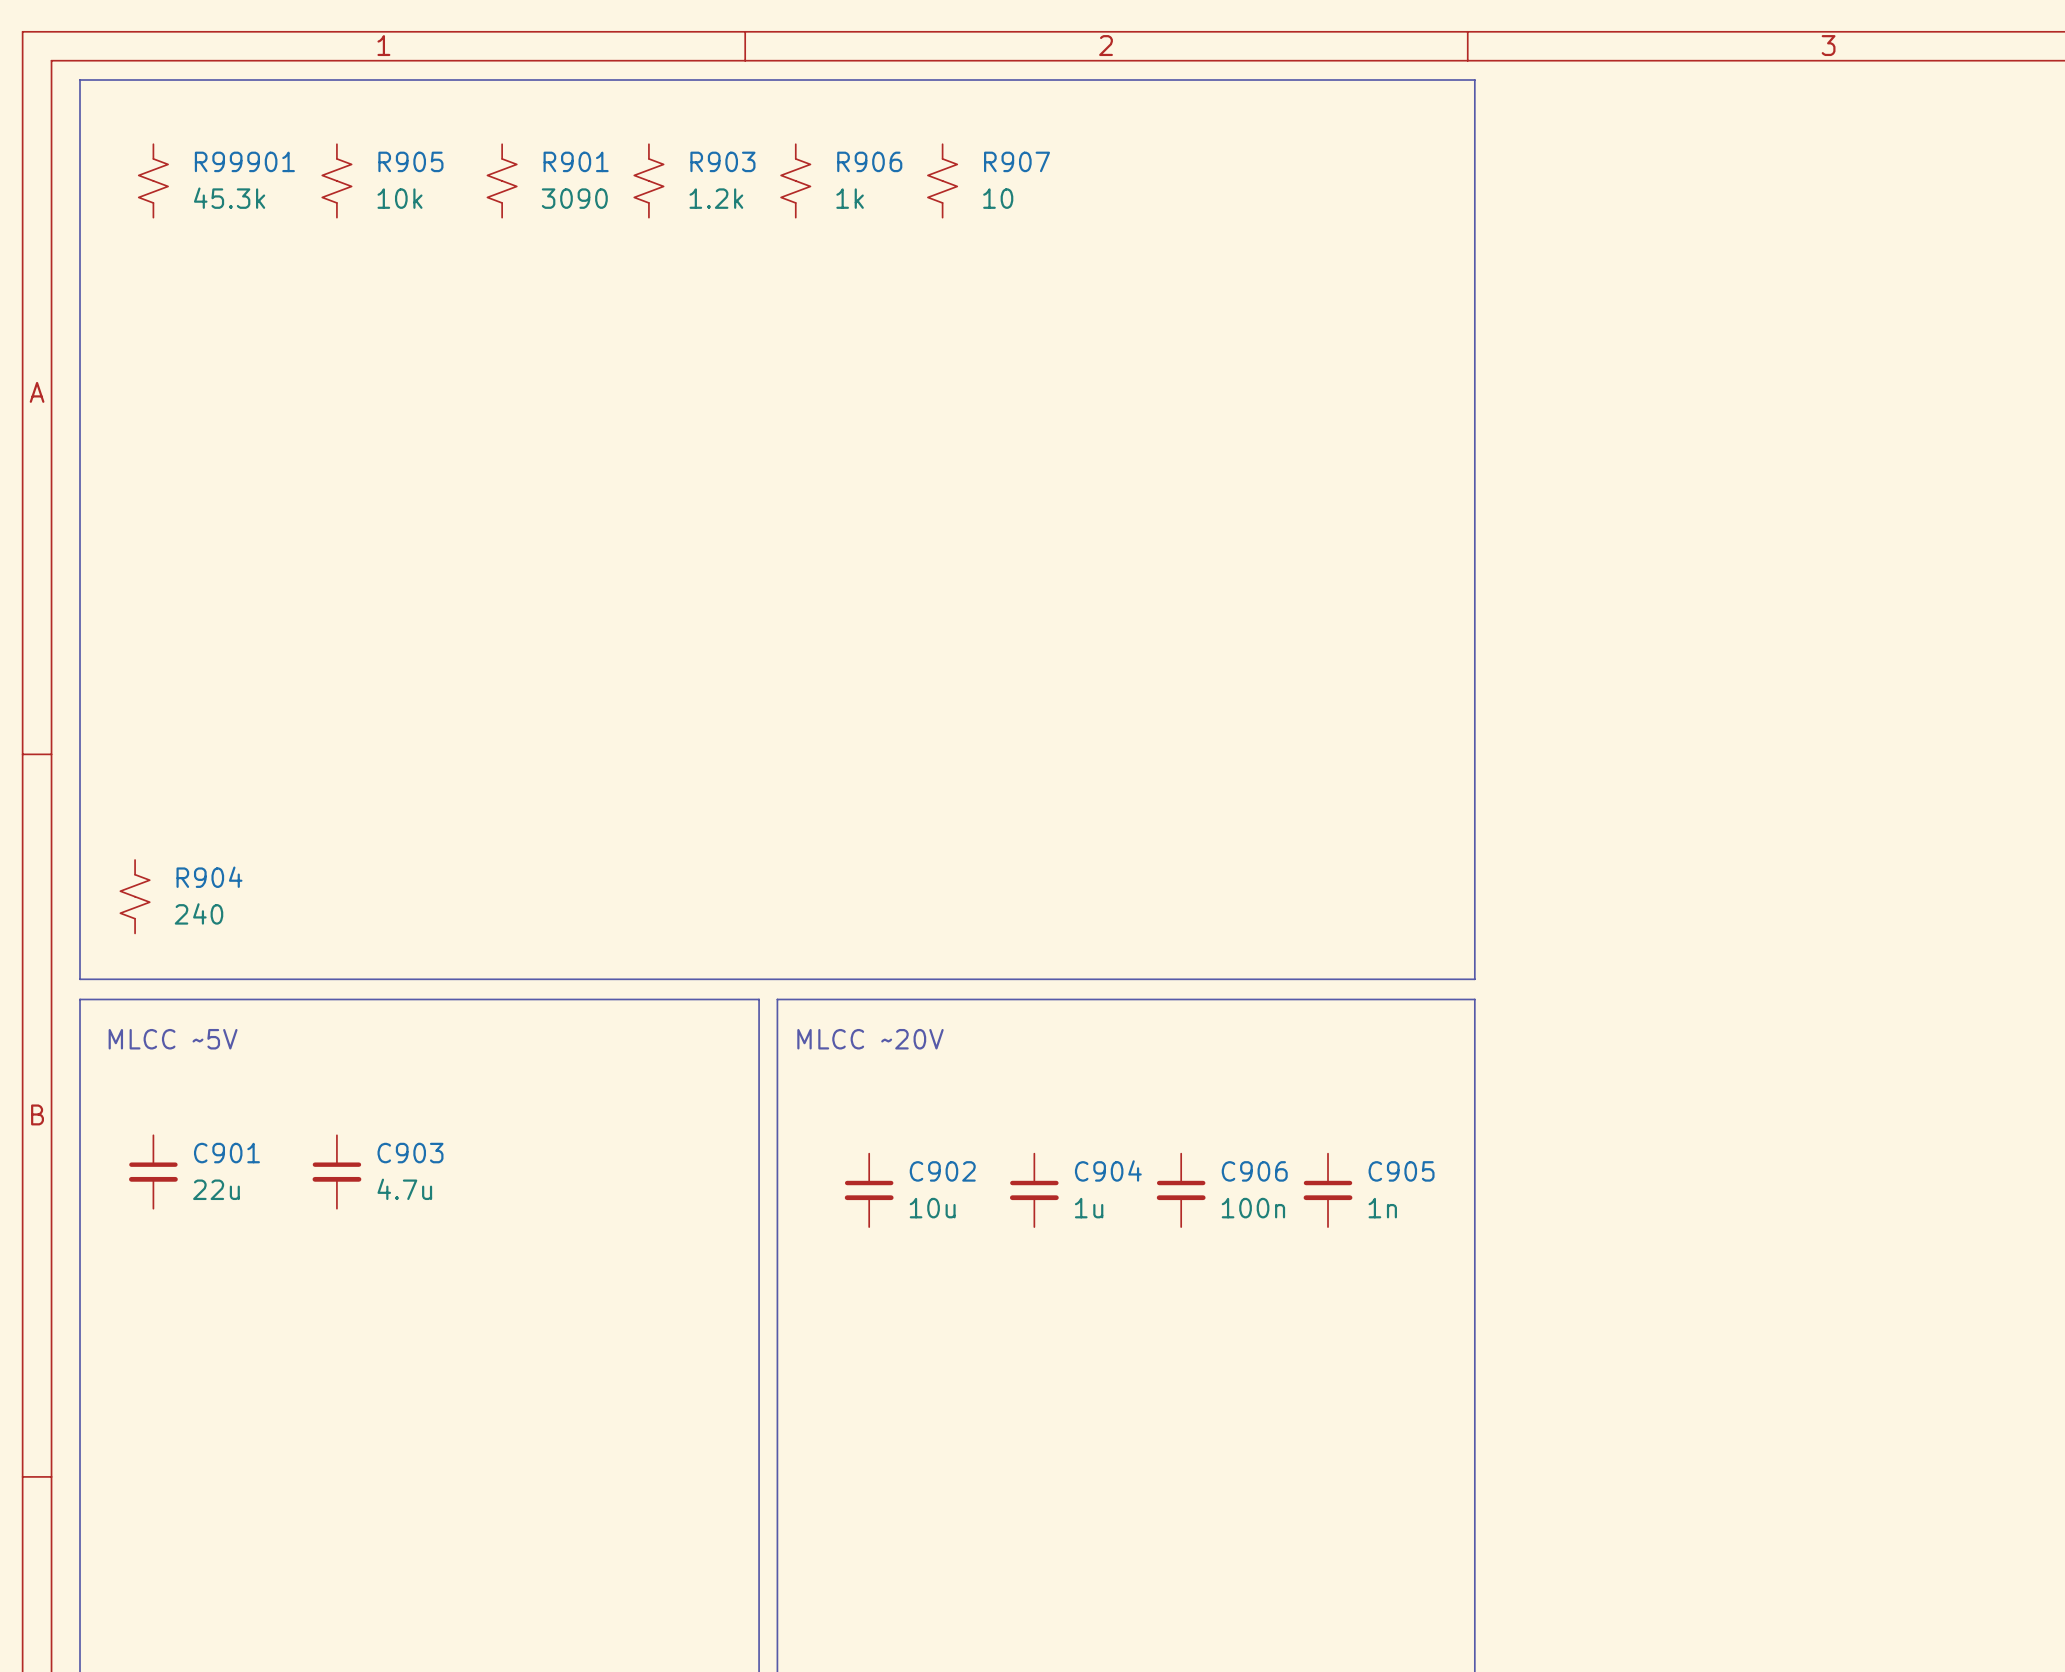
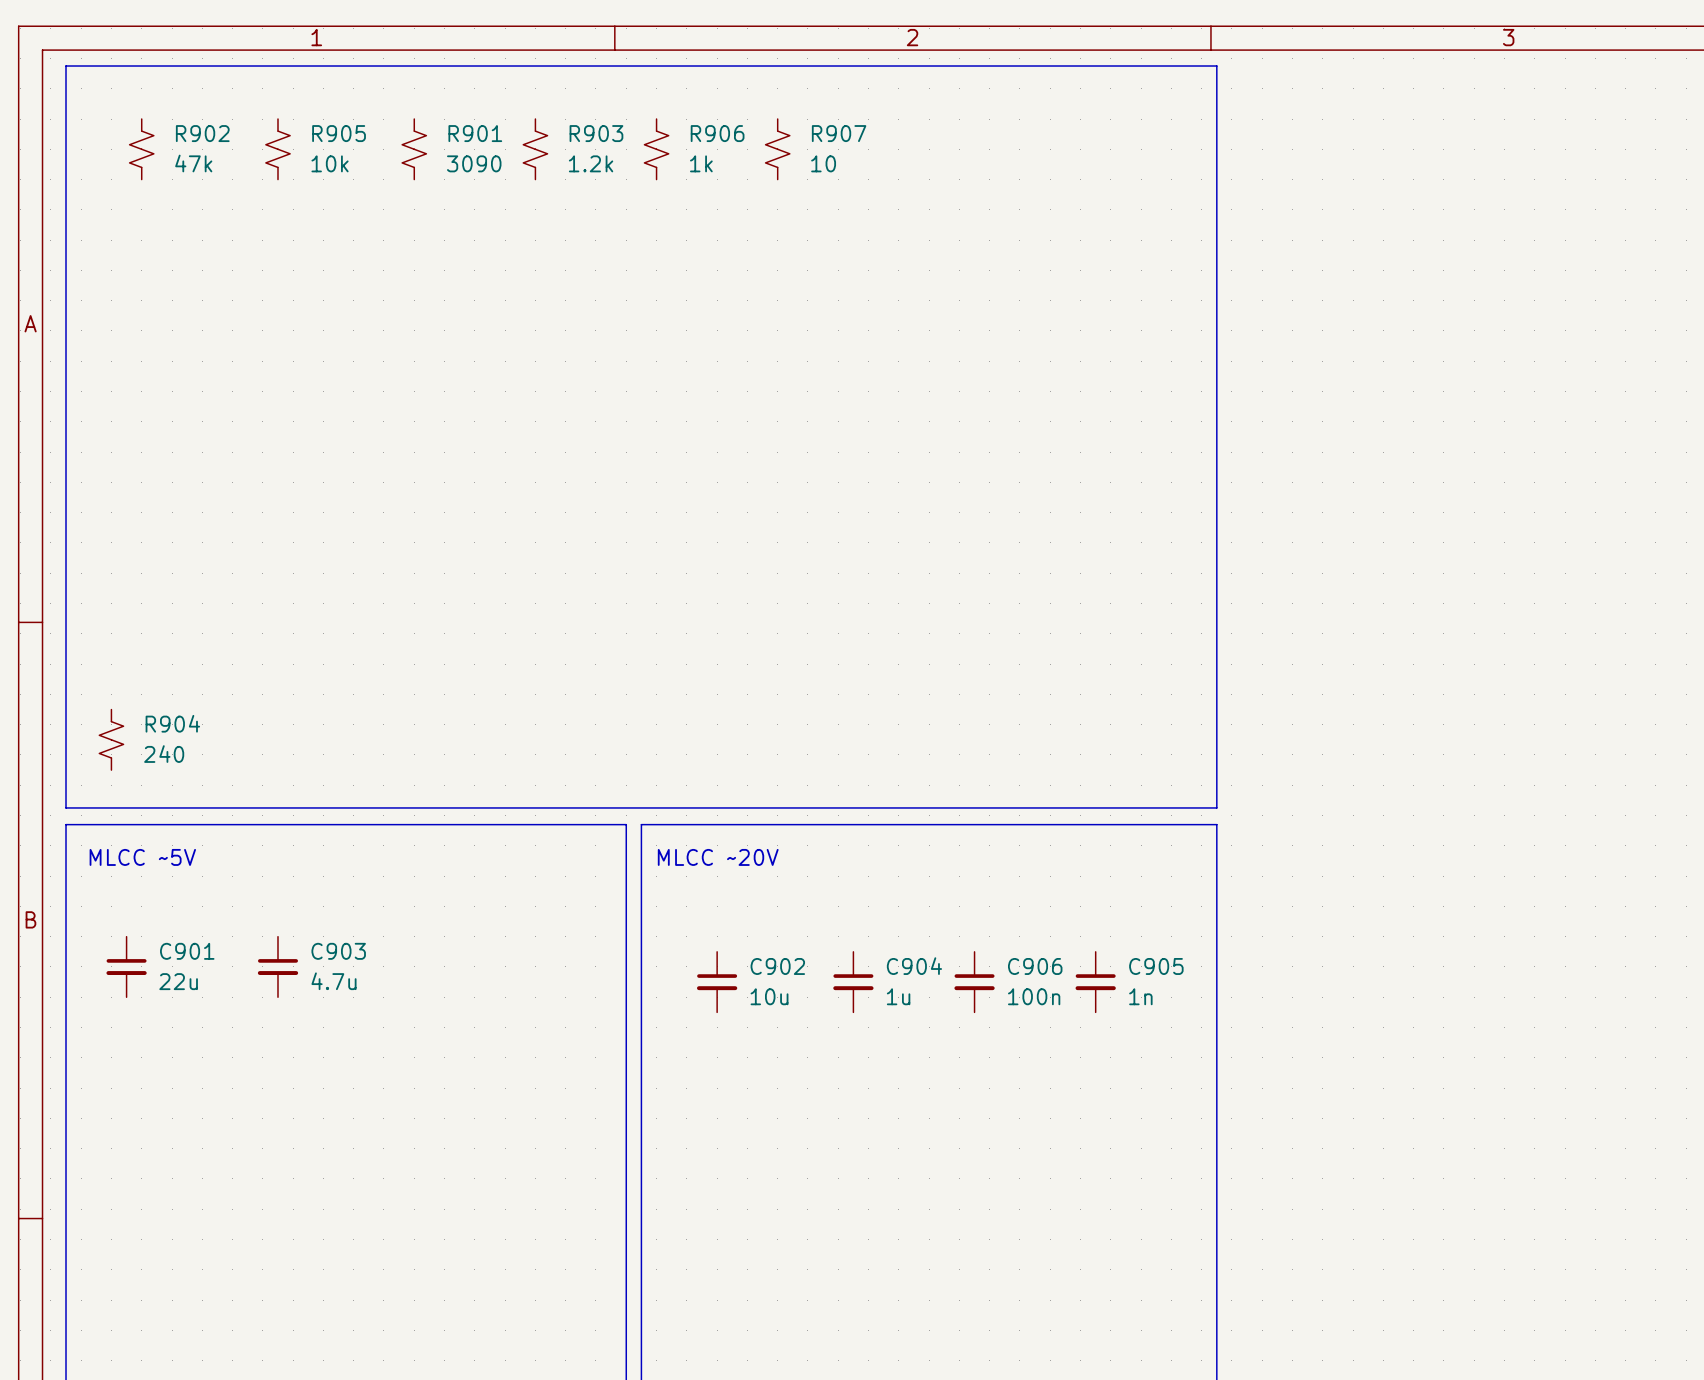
R99901: 45.3k (153, 180) -> none
R902: none -> 47k (141, 149)

